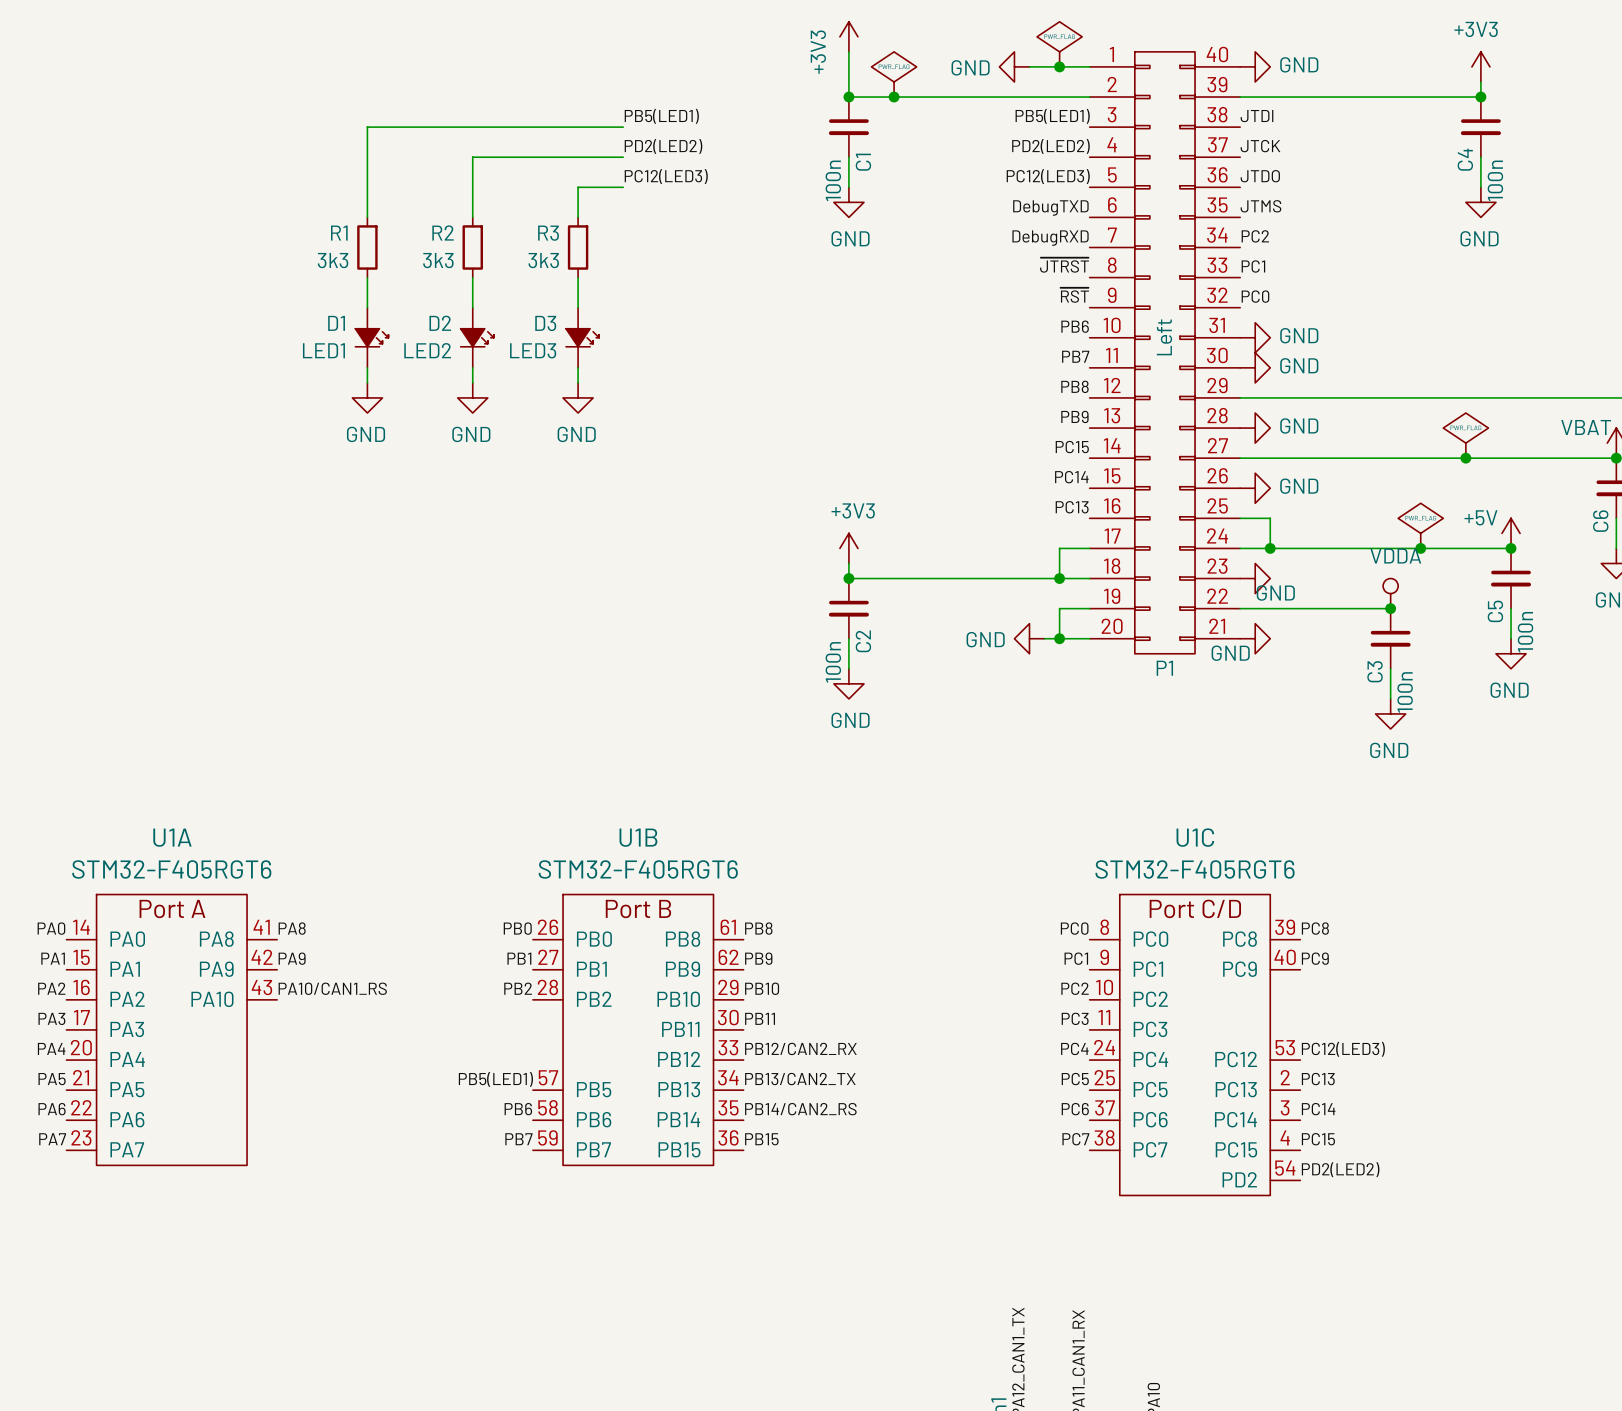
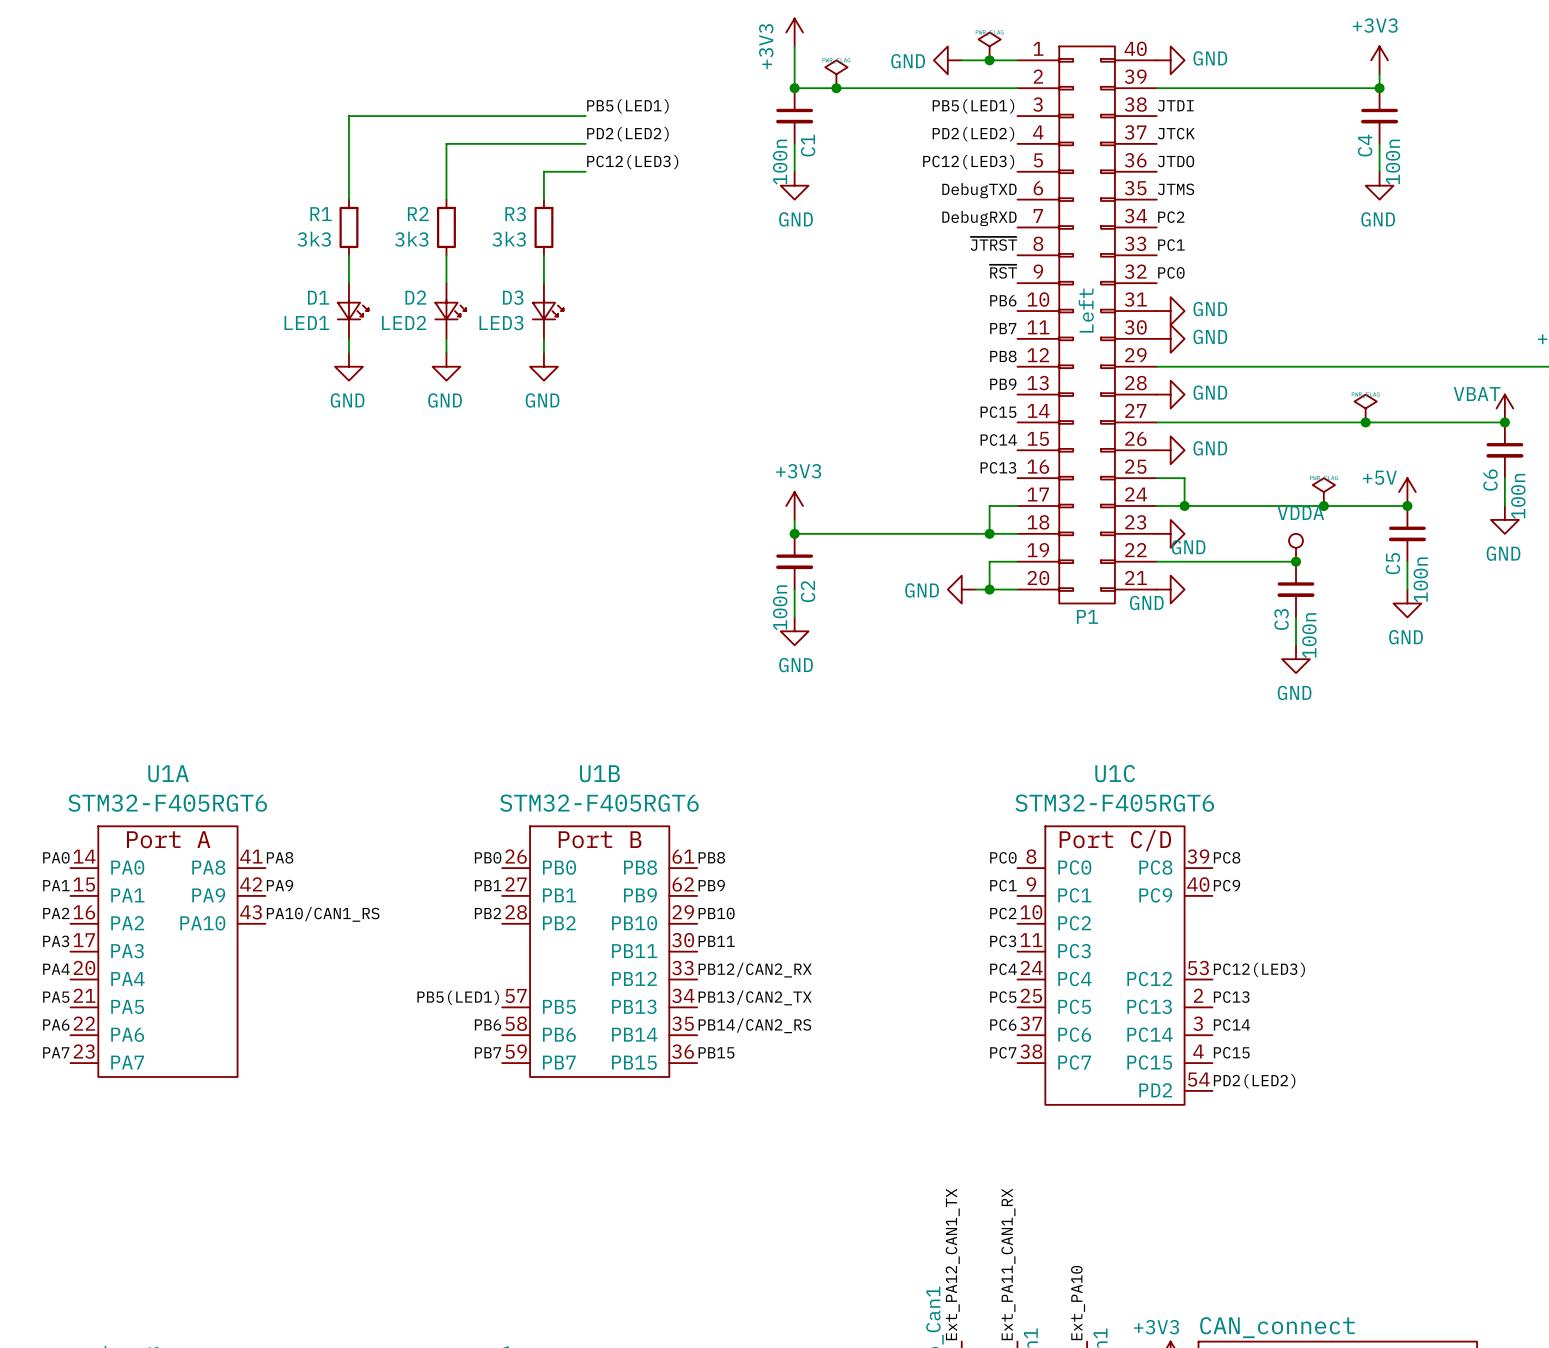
power symbol shape: [1037, 21, 1083, 67] -> [978, 32, 1001, 61]
power symbol shape: [871, 51, 917, 98] -> [825, 60, 848, 89]
D1 symbol: [355, 307, 389, 368] -> [337, 283, 369, 339]
D2 symbol: [460, 307, 494, 368] -> [435, 283, 466, 339]
D3 symbol: [566, 307, 600, 368] -> [532, 283, 564, 339]
power symbol shape: [1443, 413, 1489, 459] -> [1354, 394, 1377, 423]
power symbol shape: [1398, 503, 1444, 549] -> [1312, 478, 1336, 507]

